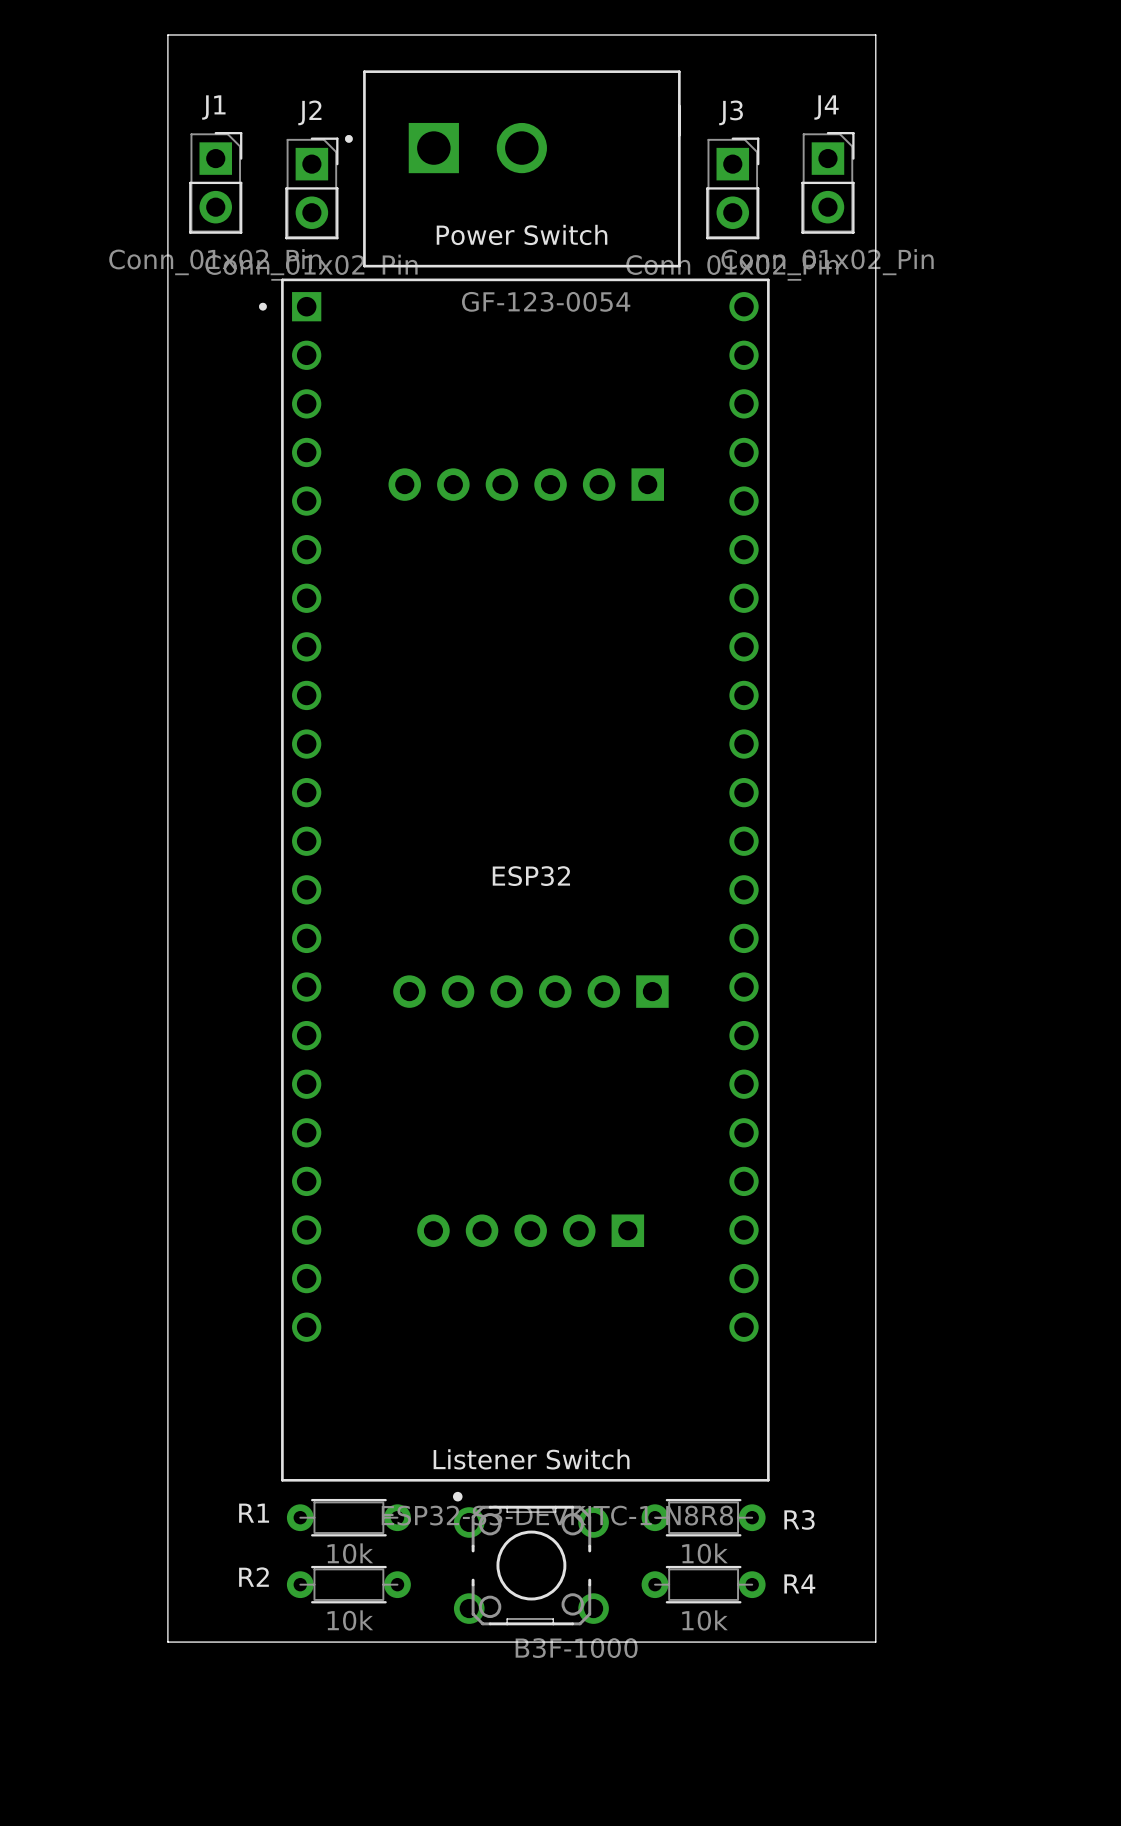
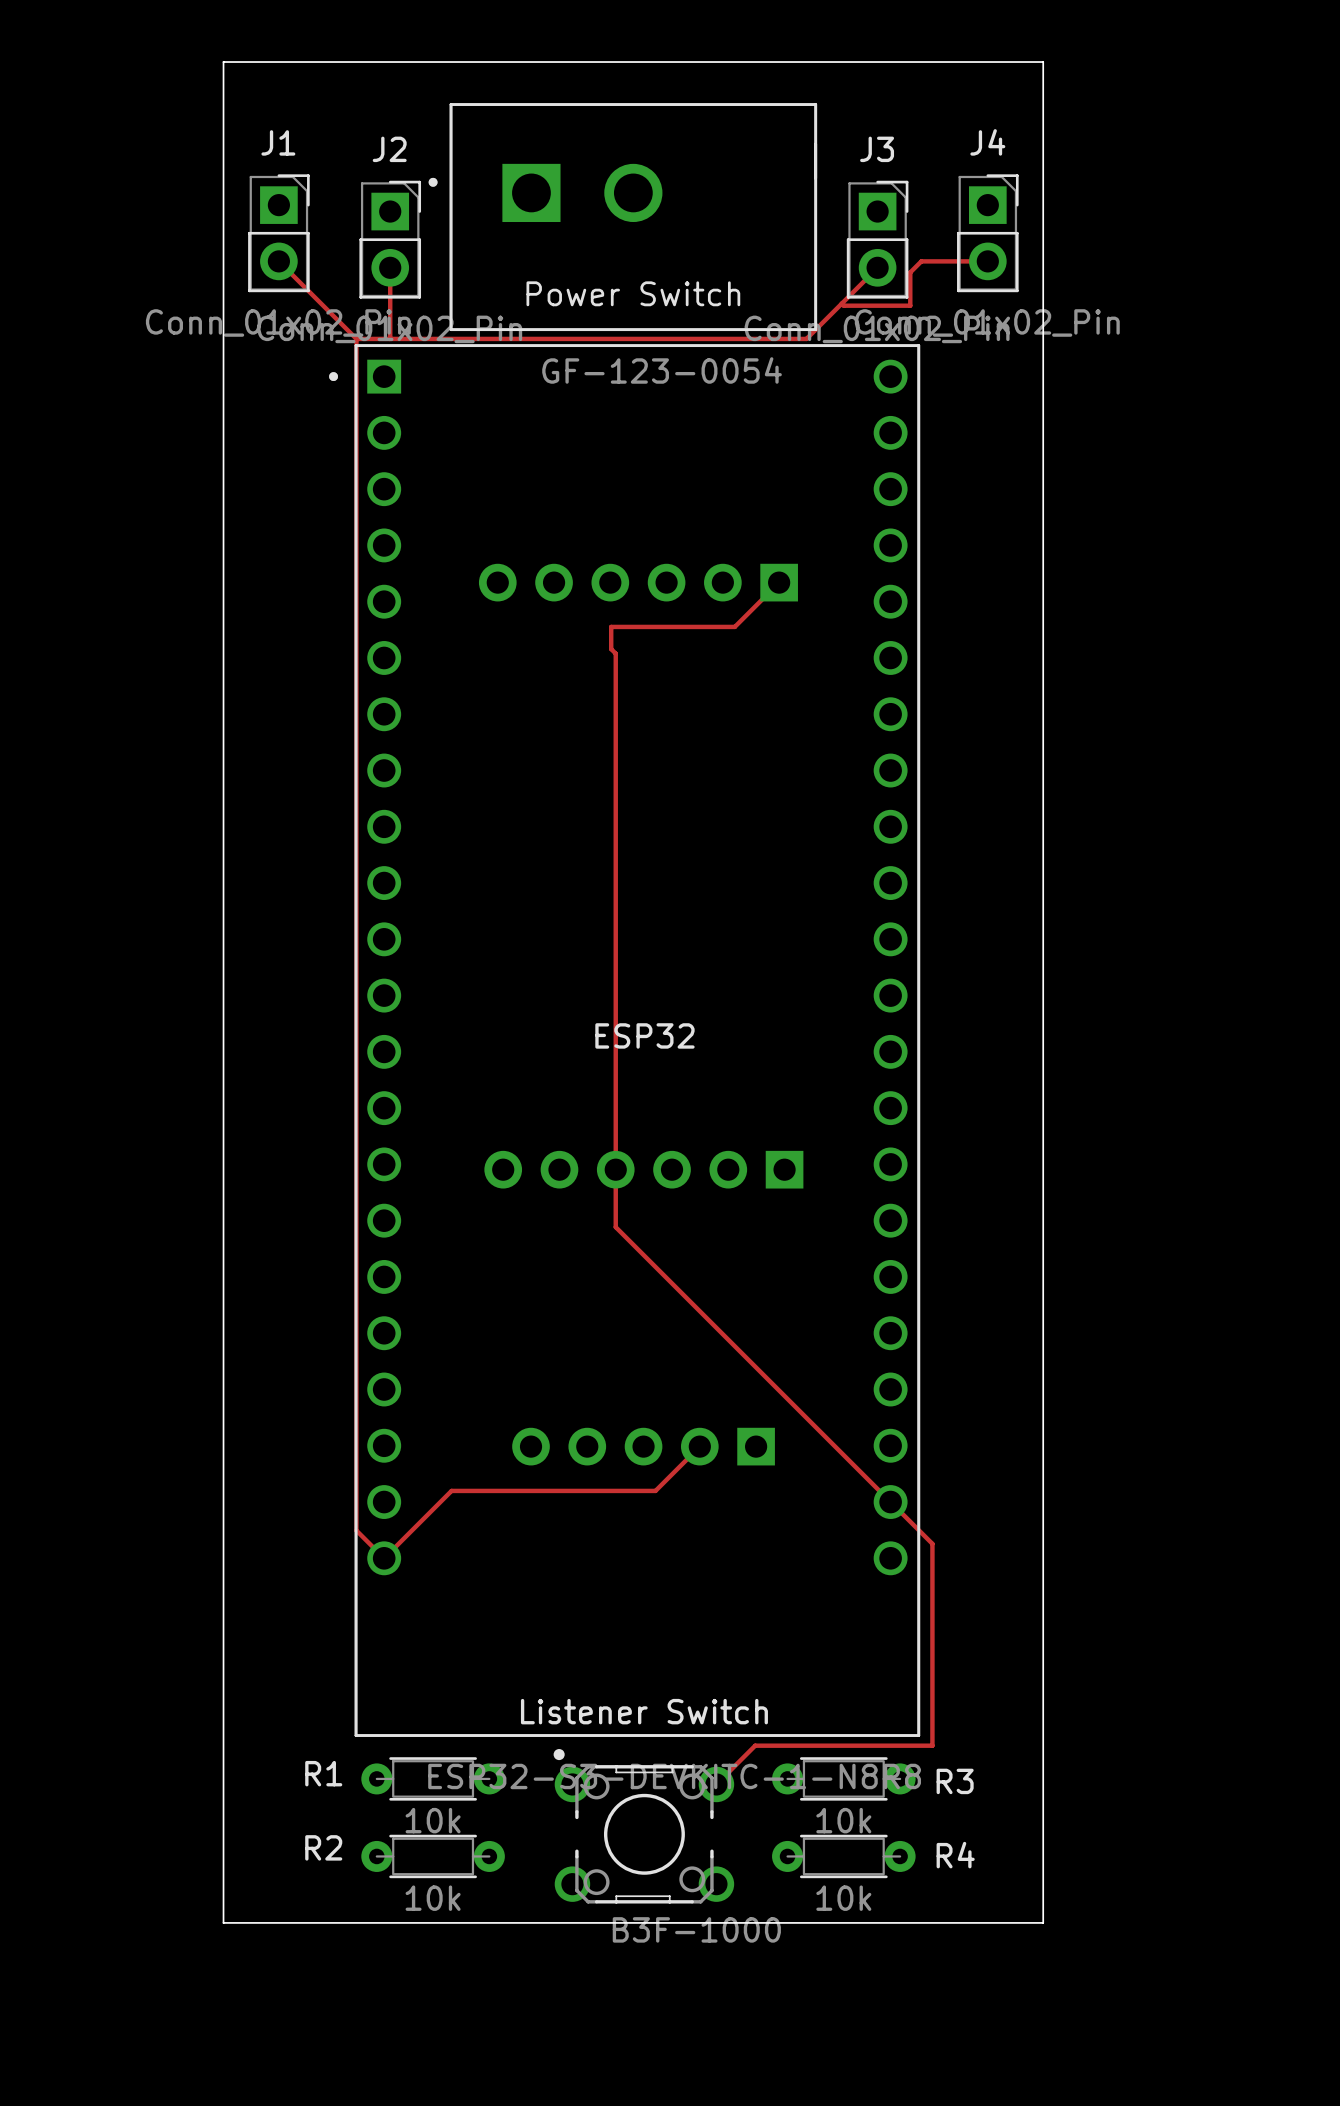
top track: none -> (278, 261) (356, 338)
top track: none -> (987, 261) (921, 261) (910, 272) (910, 305) (843, 305) (841, 303)
top track: none -> (390, 267) (389, 338)
top track: none -> (877, 267) (806, 338) (356, 338)
top track: none -> (356, 338) (356, 1530) (384, 1558) (451, 1490) (655, 1490) (699, 1446)
top track: none -> (779, 582) (734, 626) (611, 626) (611, 649) (615, 653) (615, 1227) (932, 1543) (932, 1745) (755, 1745) (716, 1784)

